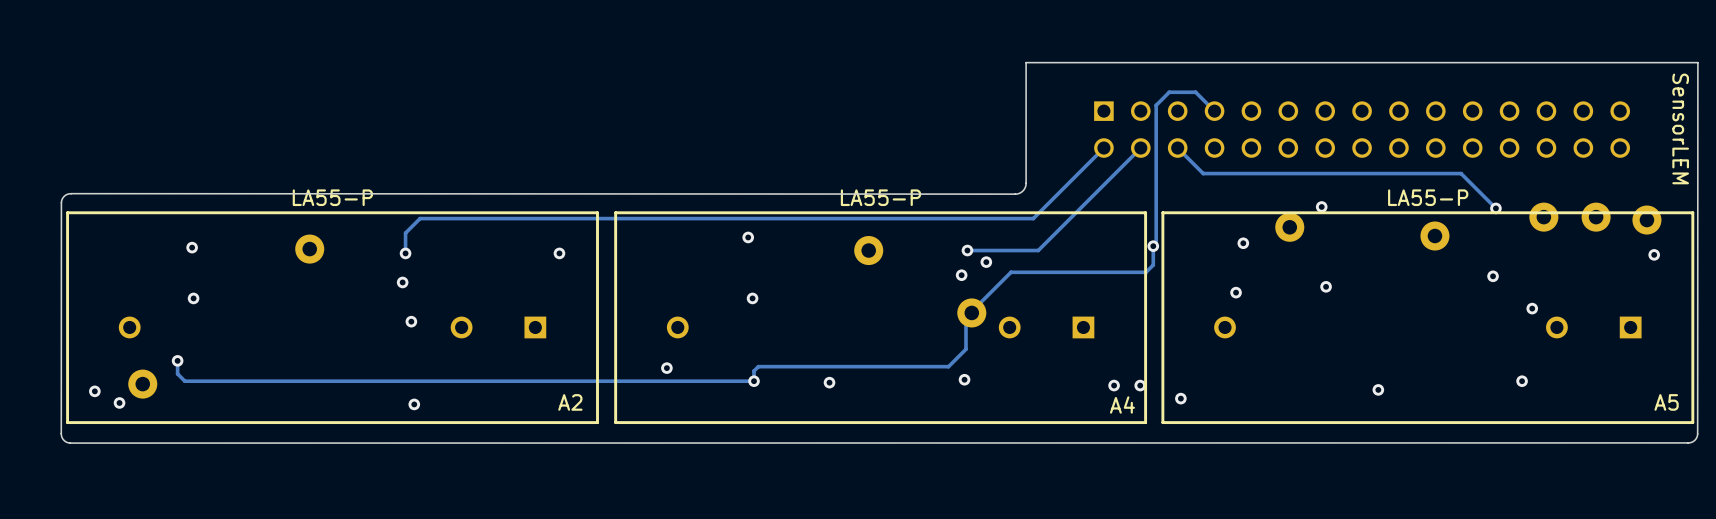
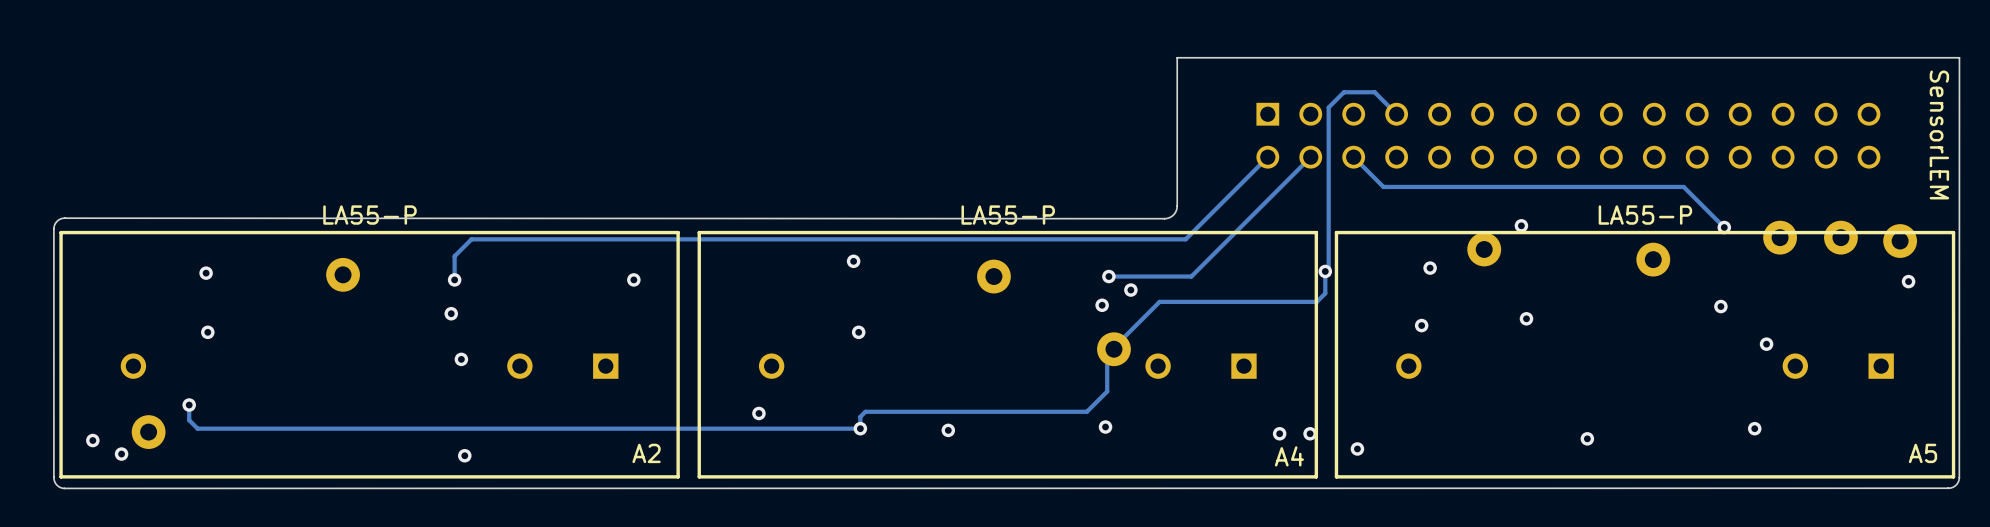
board edge: (1697, 62) (1697, 433) (1694, 440) (1689, 442) (69, 442) (63, 440) (61, 434) (61, 202) (64, 196) (71, 193) -> (1959, 57) (1959, 477) (1956, 484) (1950, 488) (64, 488) (57, 485) (54, 480) (53, 228) (55, 222) (61, 218) (1164, 218) (1170, 217) (1175, 212) (1177, 198)
board edge: (1026, 183) (1022, 190) (1015, 194) (71, 193) -> none

